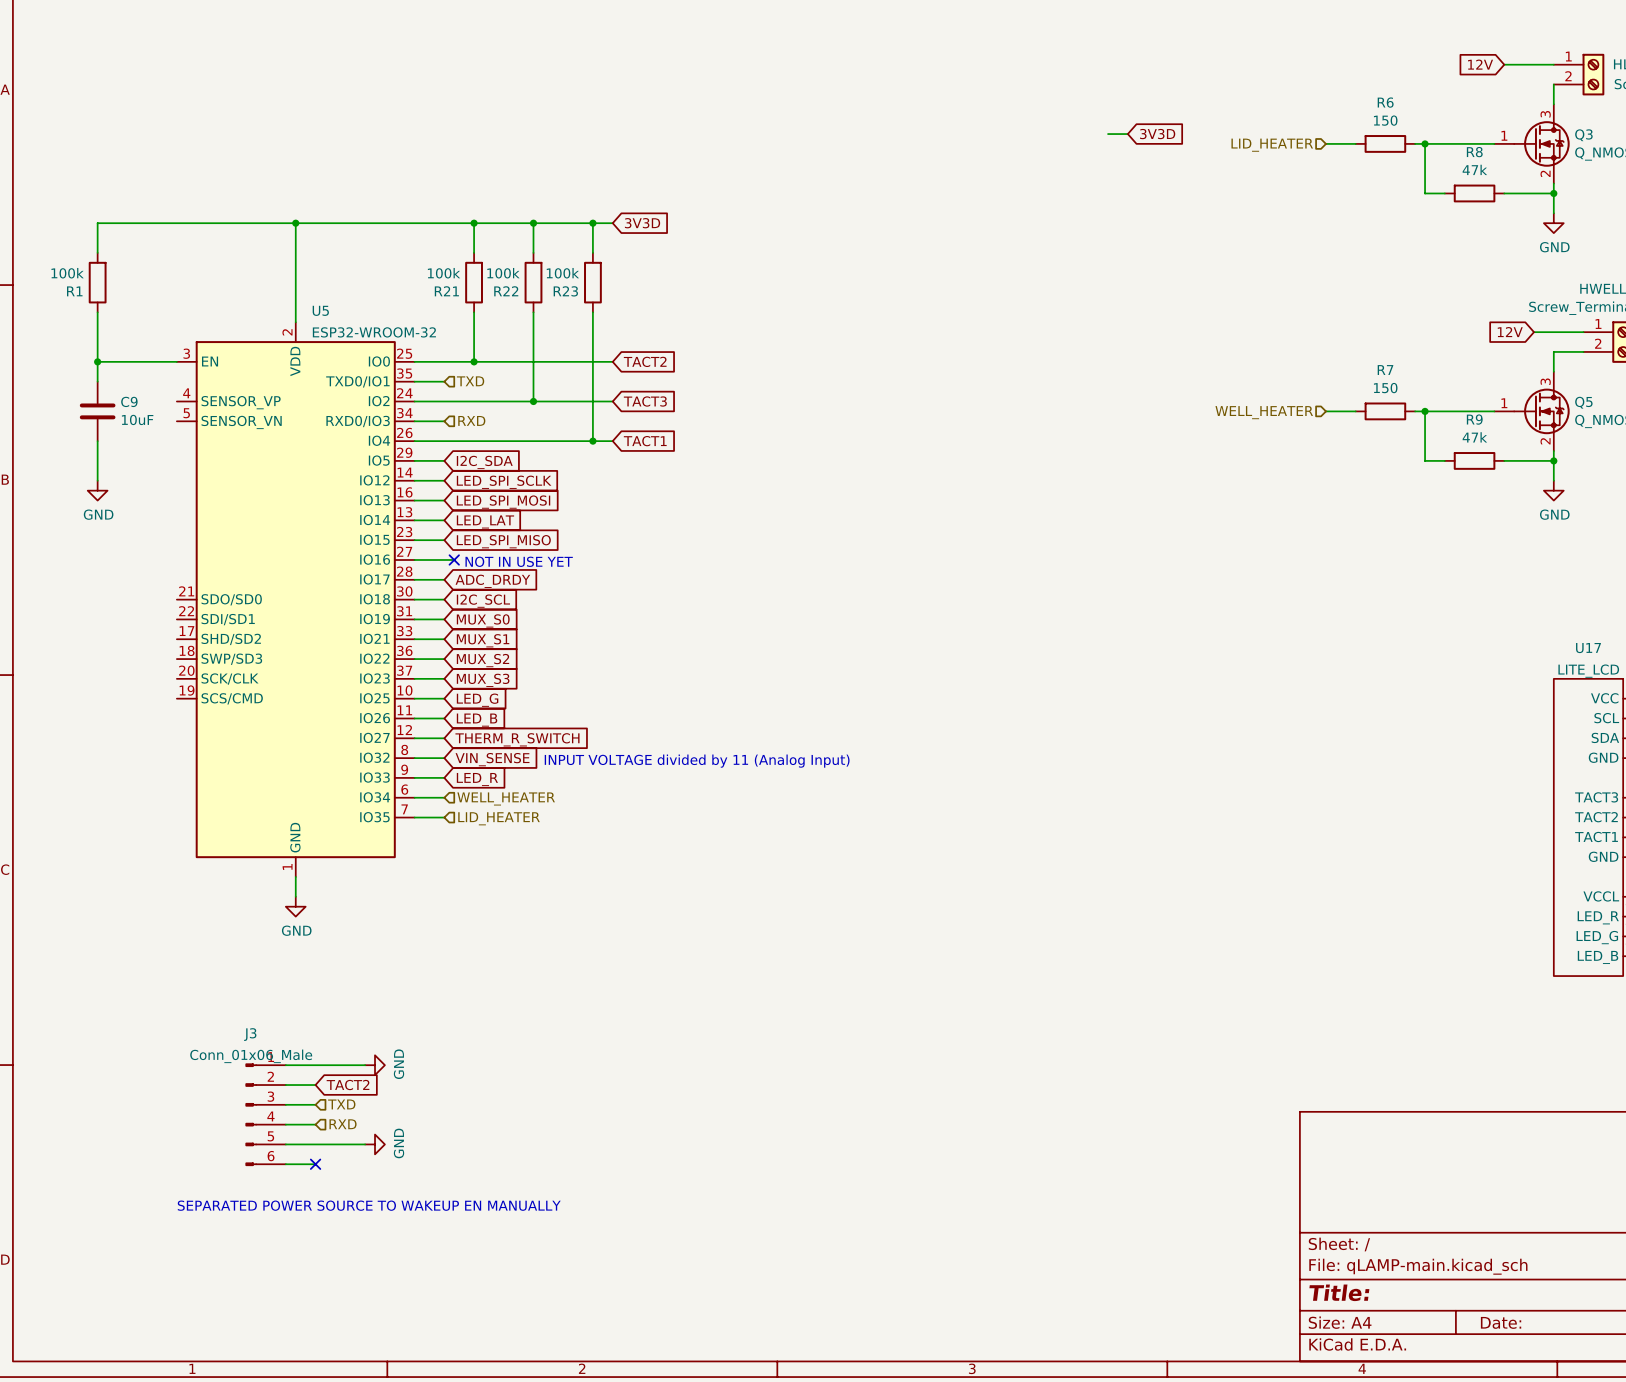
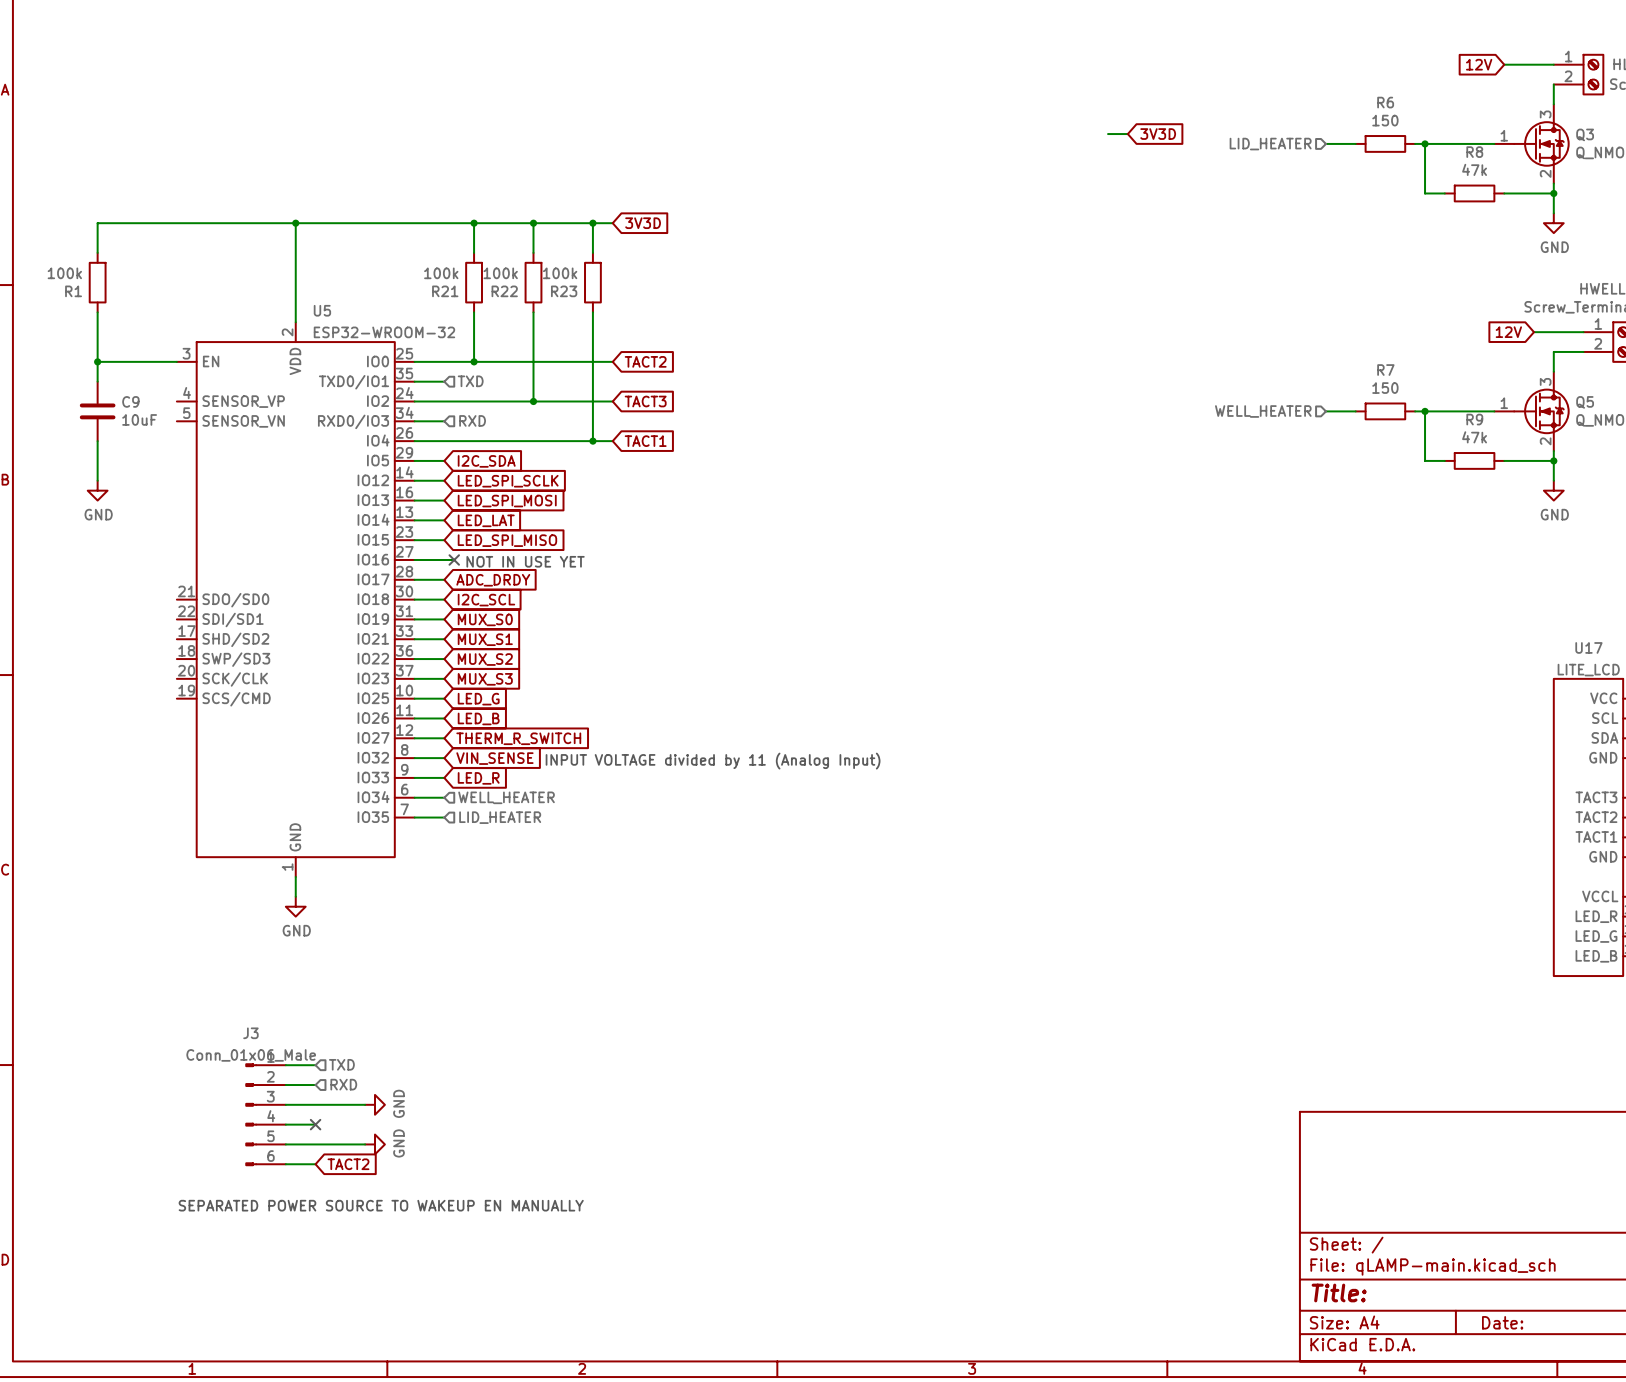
wire: (315, 1065) (365, 1065) -> (315, 1104) (365, 1104)
power symbol position: GND (375, 1065) -> GND (375, 1104)
global label position: TACT2 (348, 1085) -> TACT2 (348, 1164)
hierarchical label position: TXD (341, 1104) -> TXD (341, 1064)
hierarchical label position: RXD (343, 1124) -> RXD (343, 1084)
no-connect mark position: (315, 1164) -> (315, 1124)

